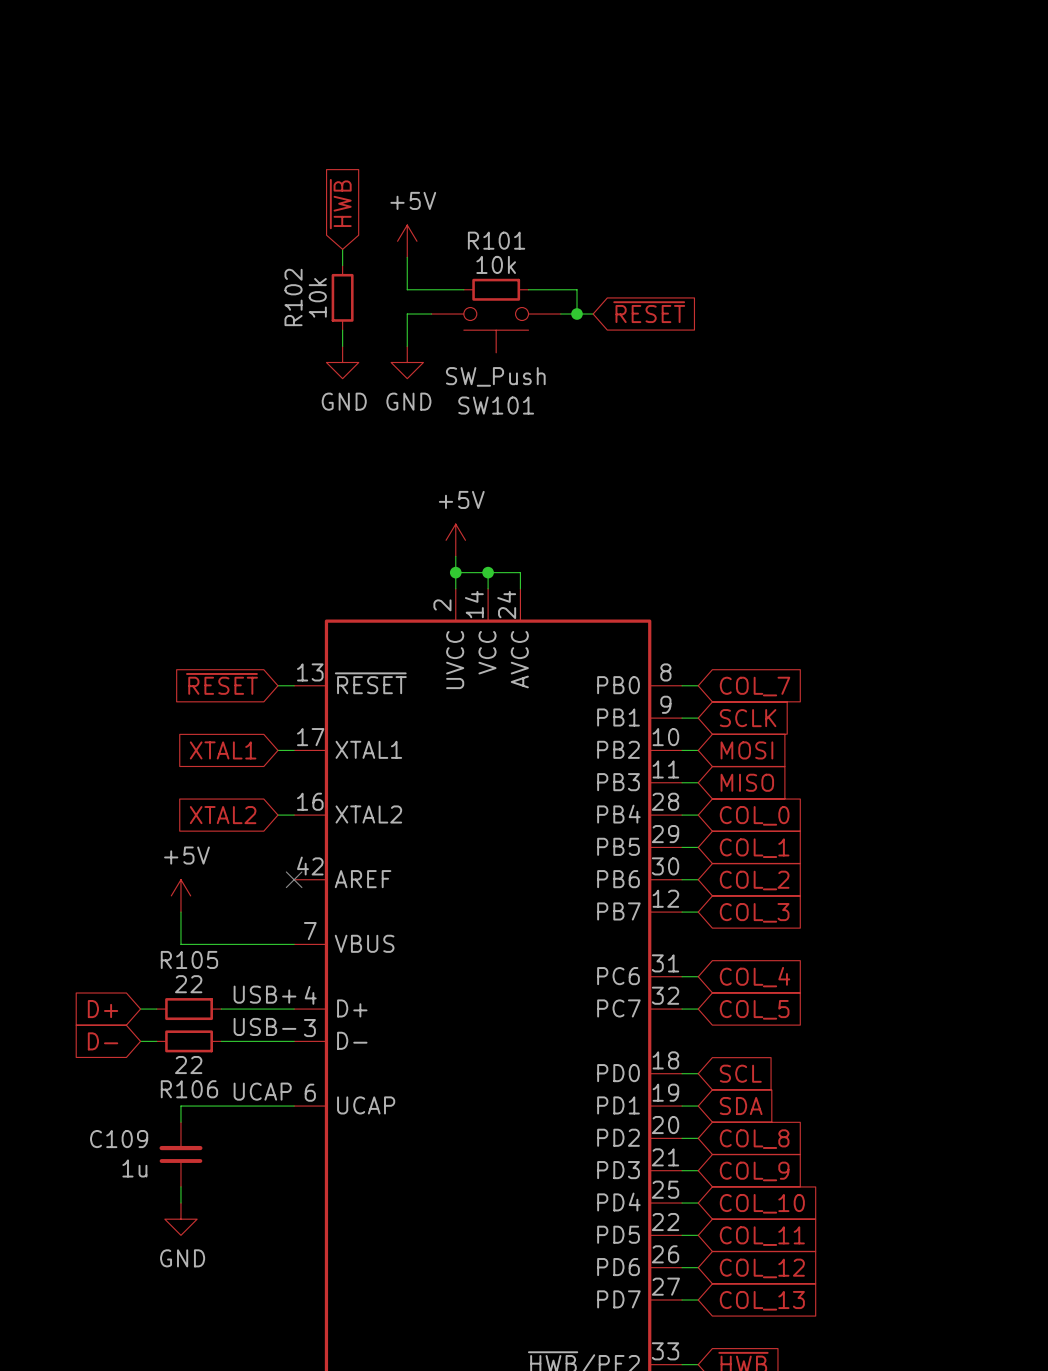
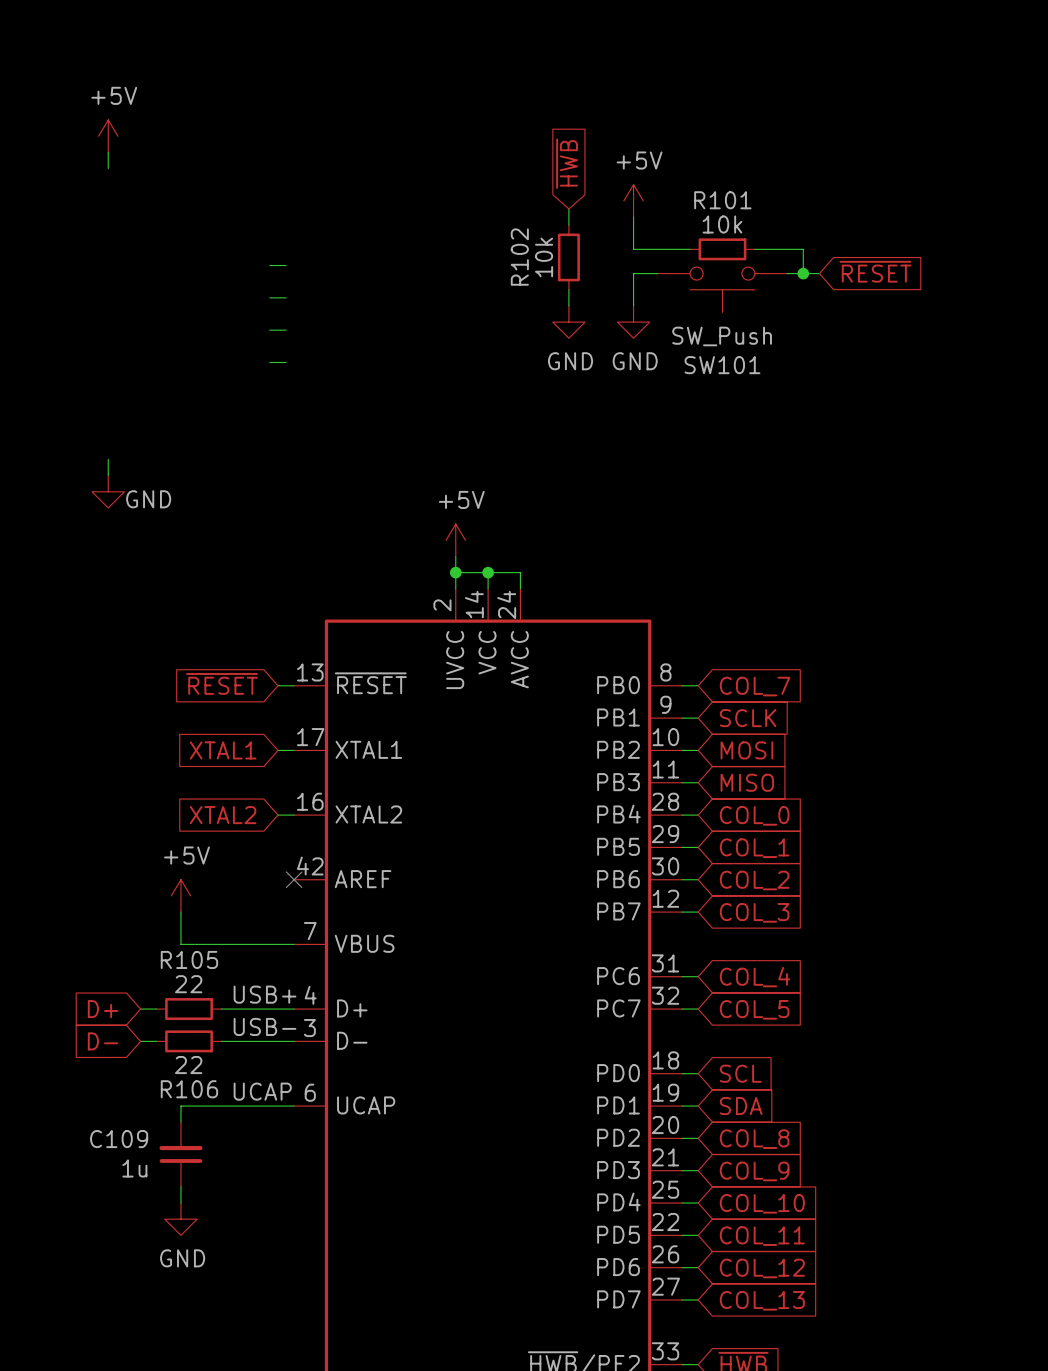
power symbol: none -> +5V (108, 136)
wire: none -> (108, 152) (108, 168)
power symbol: none -> +5V (633, 200)
global label position: ~{HWB} (340, 204) -> ~{HWB} (567, 163)
power symbol: +5V (407, 241) -> none
wire: (342, 249) (342, 265) -> (568, 208) (568, 225)
wire: (407, 257) (407, 289) (463, 289) -> (633, 217) (633, 249) (690, 249)
wire: none -> (269, 265) (286, 265)
junction: none -> (803, 273)
R101 position: (496, 289) -> (722, 249)
wire: (528, 289) (576, 289) (576, 314) -> (754, 249) (803, 249) (803, 273)
wire: none -> (269, 297) (286, 297)
R102 position: (342, 297) -> (568, 257)
global label position: ~{RESET} (649, 312) -> ~{RESET} (875, 271)
wire: (431, 314) (407, 314) (407, 346) -> (657, 273) (633, 273) (633, 305)
wire: (560, 314) (593, 314) -> (787, 273) (819, 273)
junction: (576, 314) -> none
power symbol: none -> GND (568, 322)
power symbol: none -> GND (633, 322)
wire: none -> (269, 330) (286, 330)
wire: (342, 330) (342, 346) -> (568, 289) (568, 305)
SW101 position: (496, 330) -> (722, 289)
wire: none -> (269, 362) (286, 362)
power symbol: GND (342, 362) -> none
power symbol: GND (407, 362) -> none
wire: none -> (108, 459) (108, 475)
power symbol: none -> GND (108, 491)

